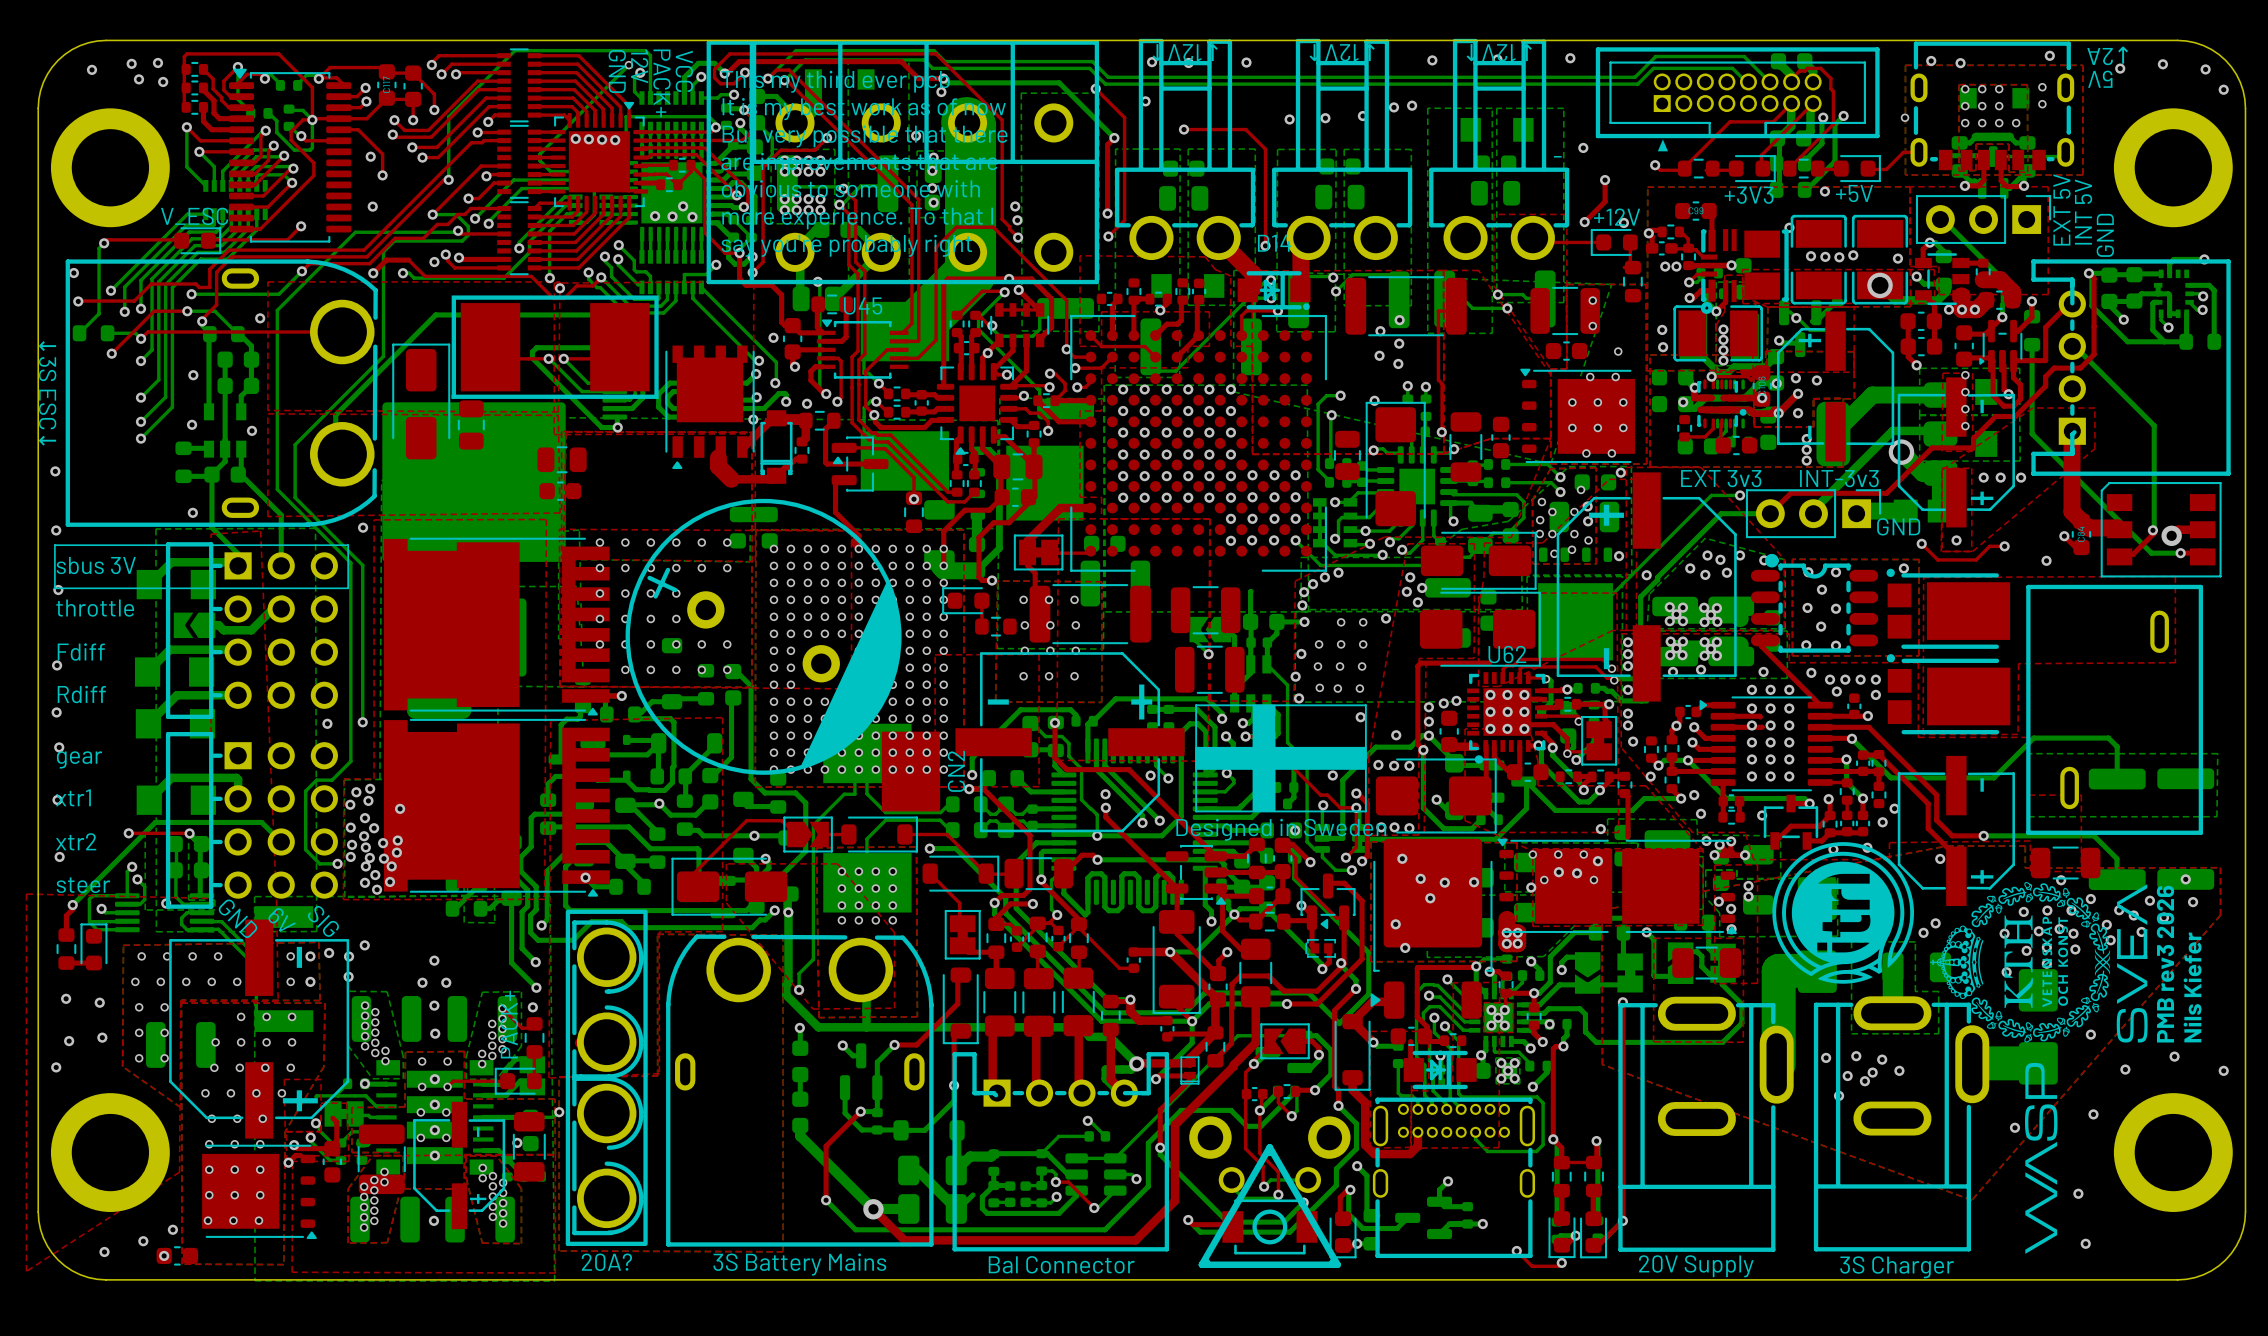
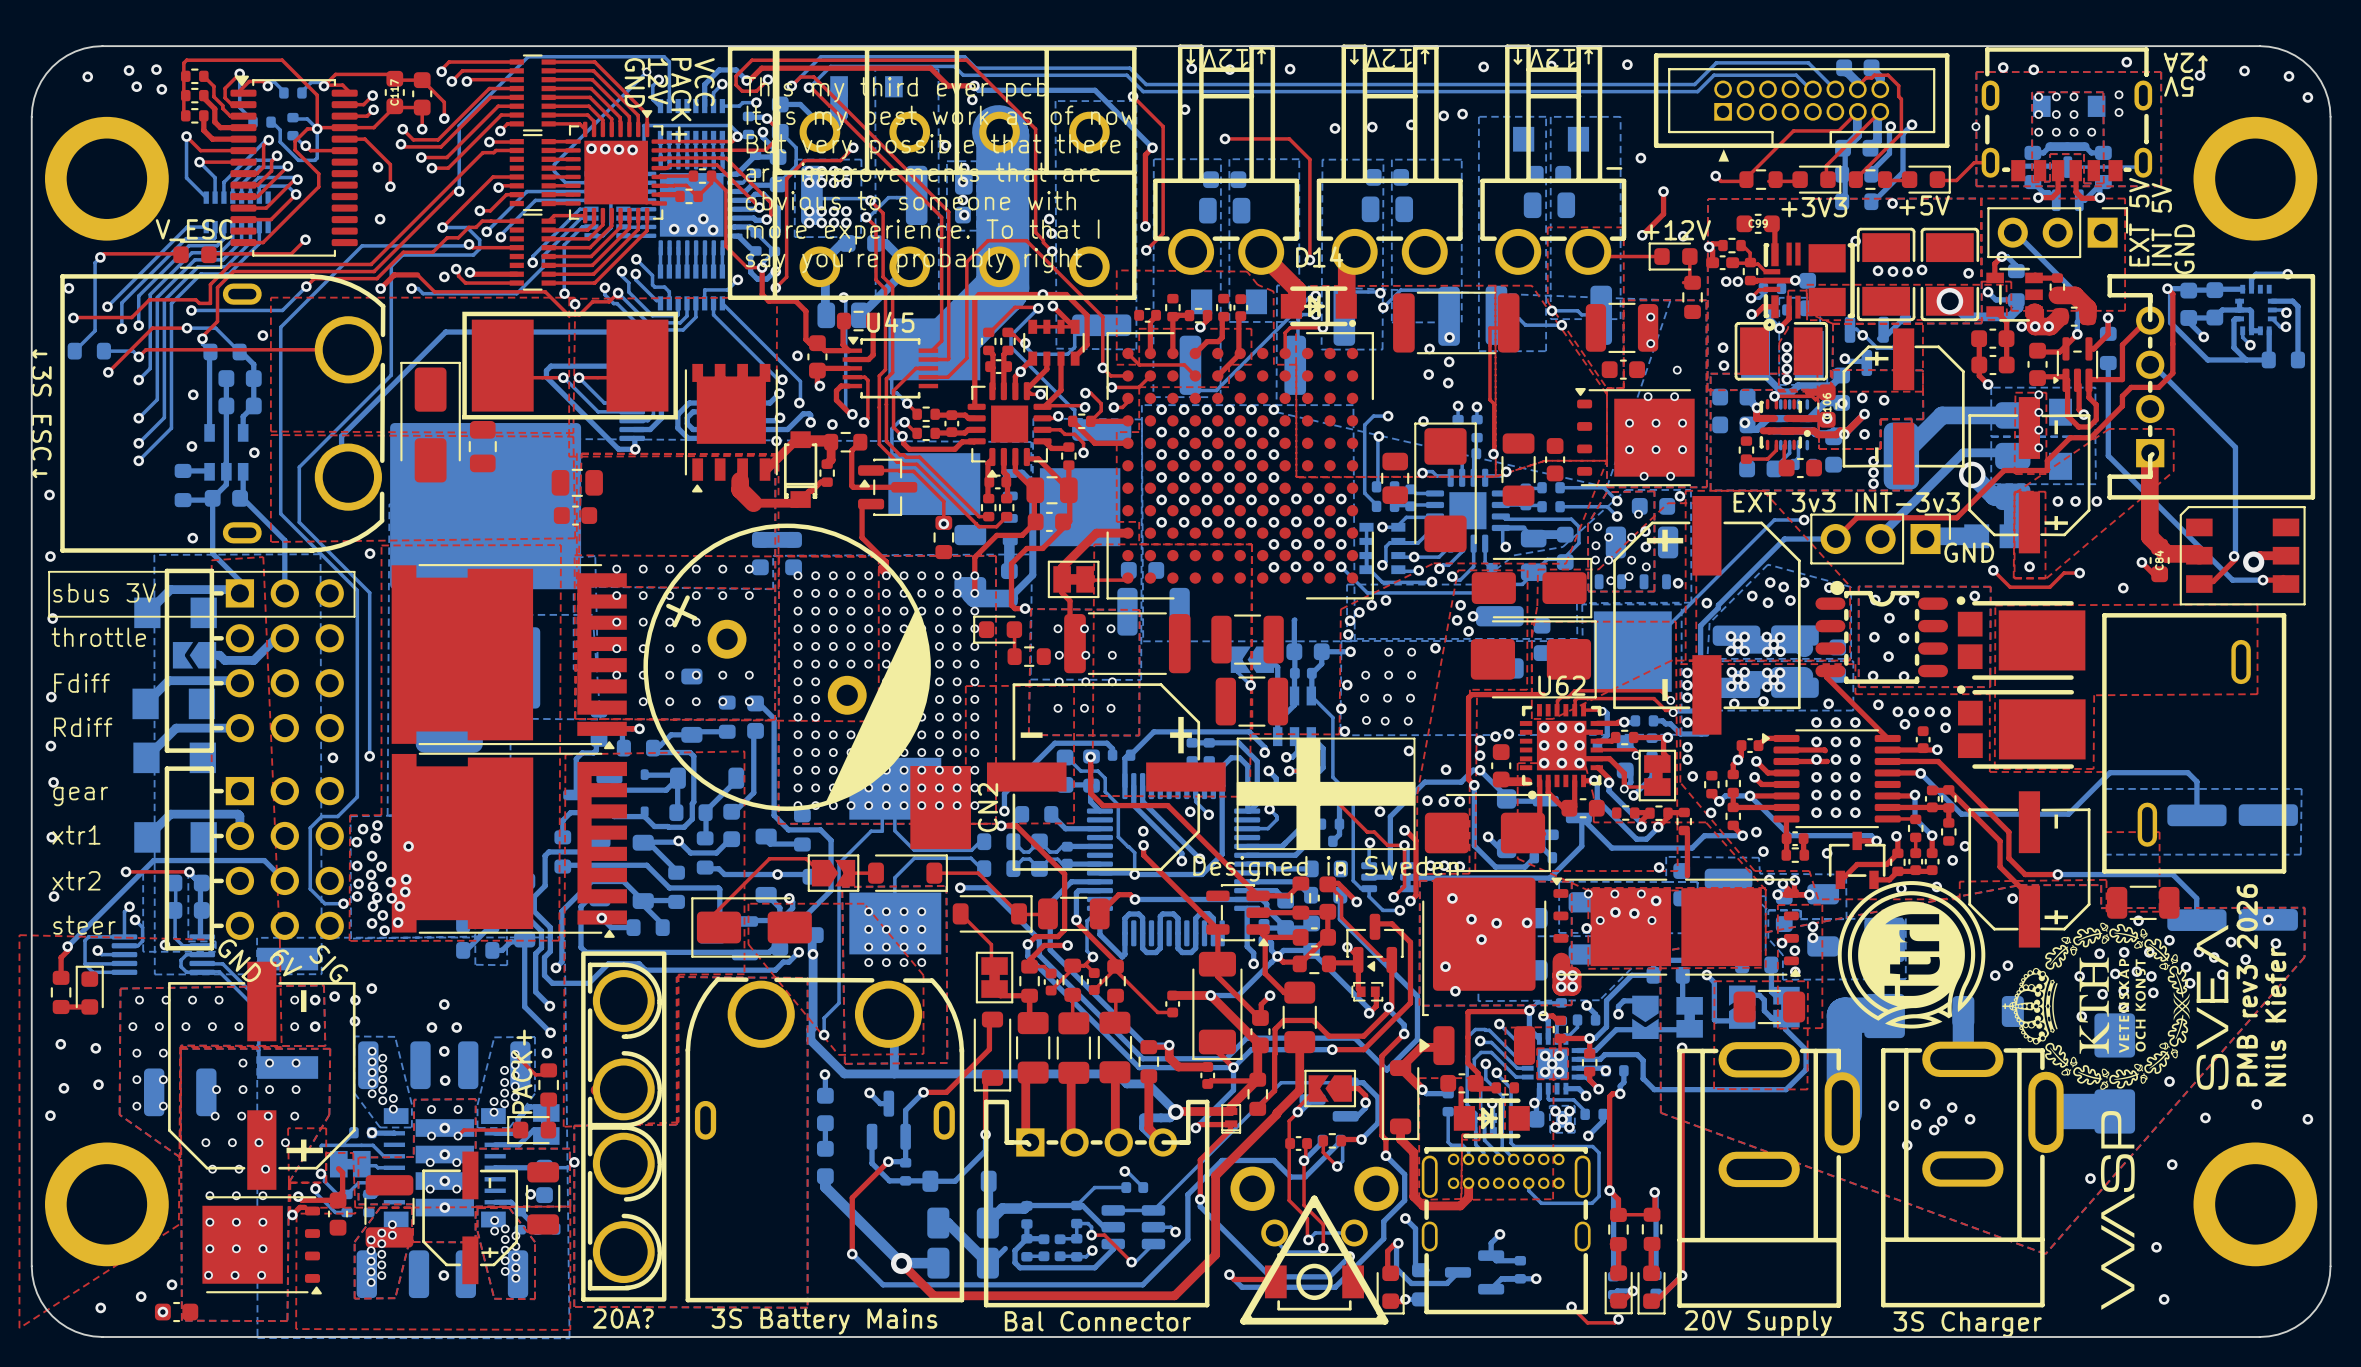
bottom zone outline: (1851, 941) (1851, 1033) (1938, 1033) (1938, 991) (1915, 991) (1915, 941) (1851, 941) -> none

